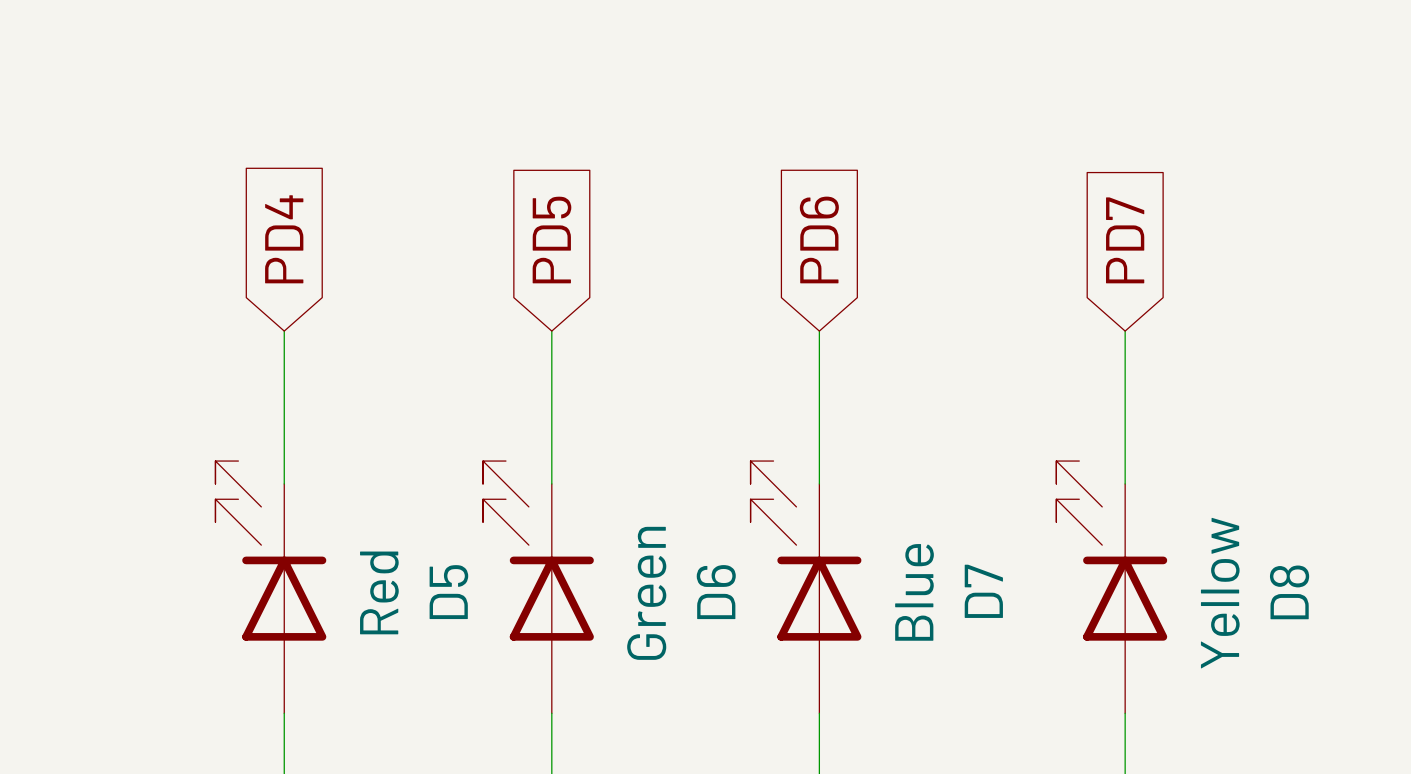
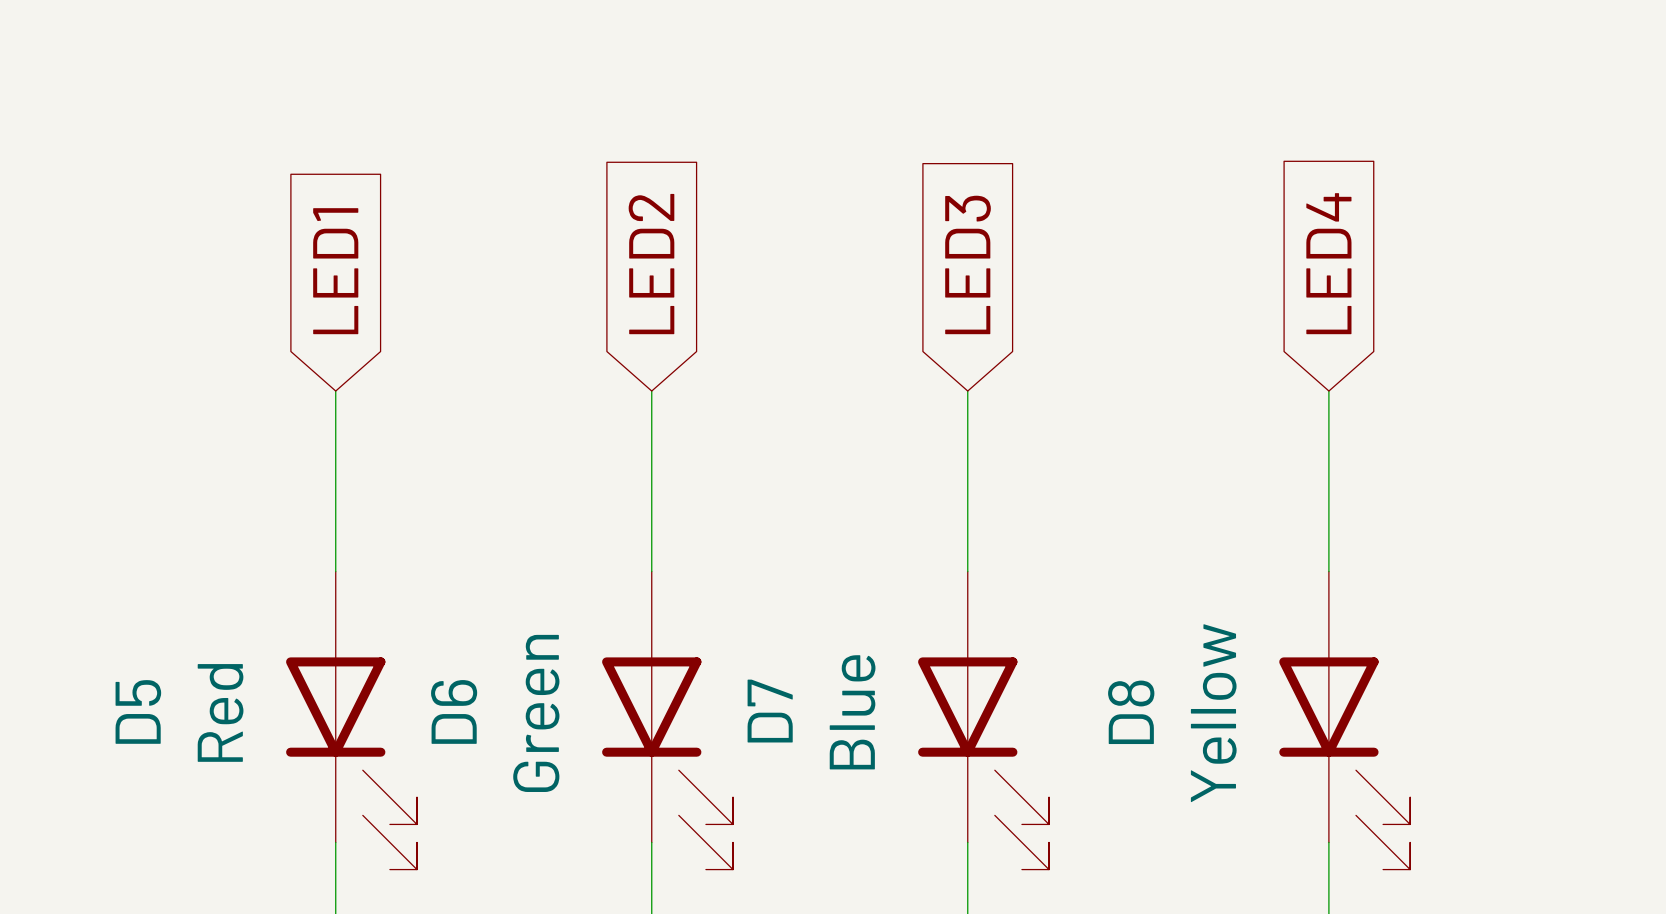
global label: PD4 (284, 239) -> LED1 (335, 271)
global label: PD6 (819, 239) -> LED3 (968, 264)
global label: PD5 (551, 240) -> LED2 (651, 264)
global label: PD7 (1125, 240) -> LED4 (1328, 263)
D5 rotation: 0° (270, 550) -> 180° (351, 763)
D6 rotation: 0° (538, 550) -> 180° (667, 763)
D7 rotation: 0° (805, 550) -> 180° (983, 763)
D8 rotation: 0° (1111, 550) -> 180° (1344, 763)

